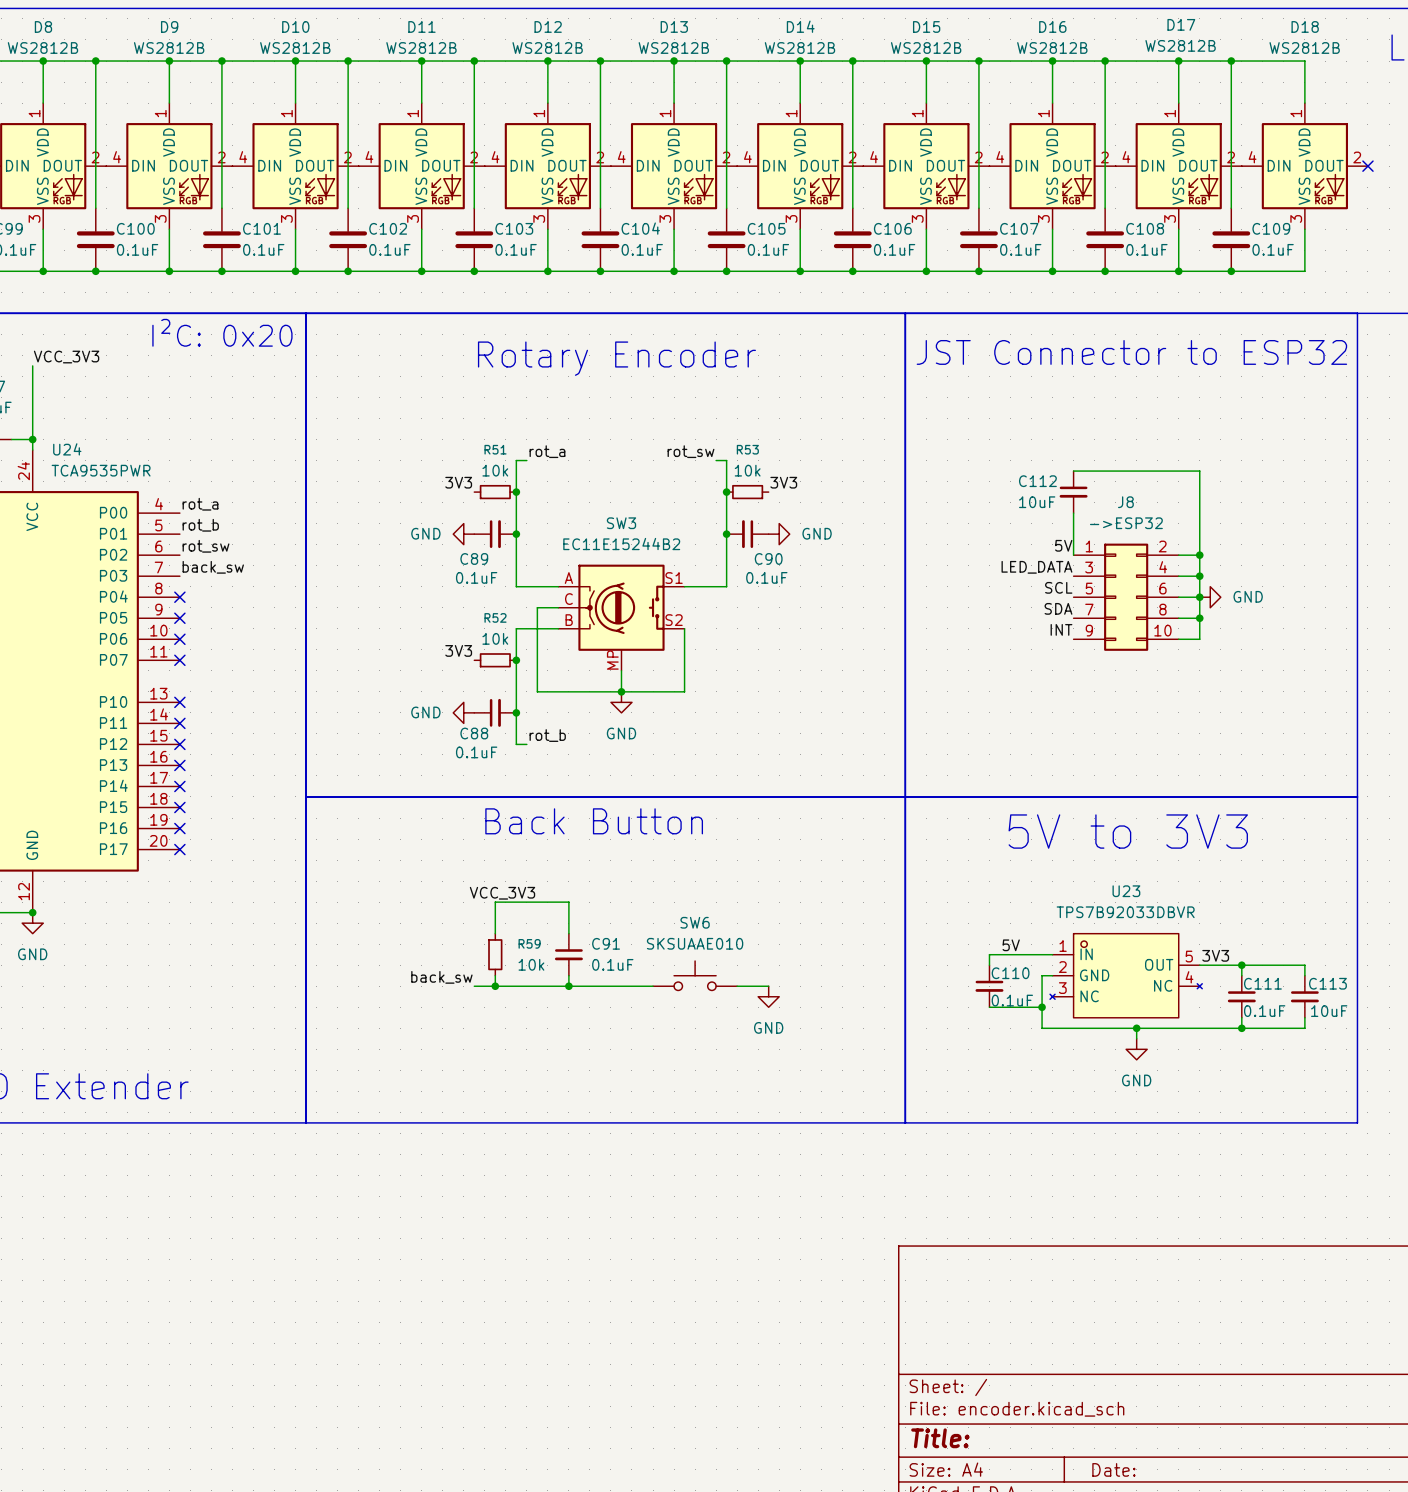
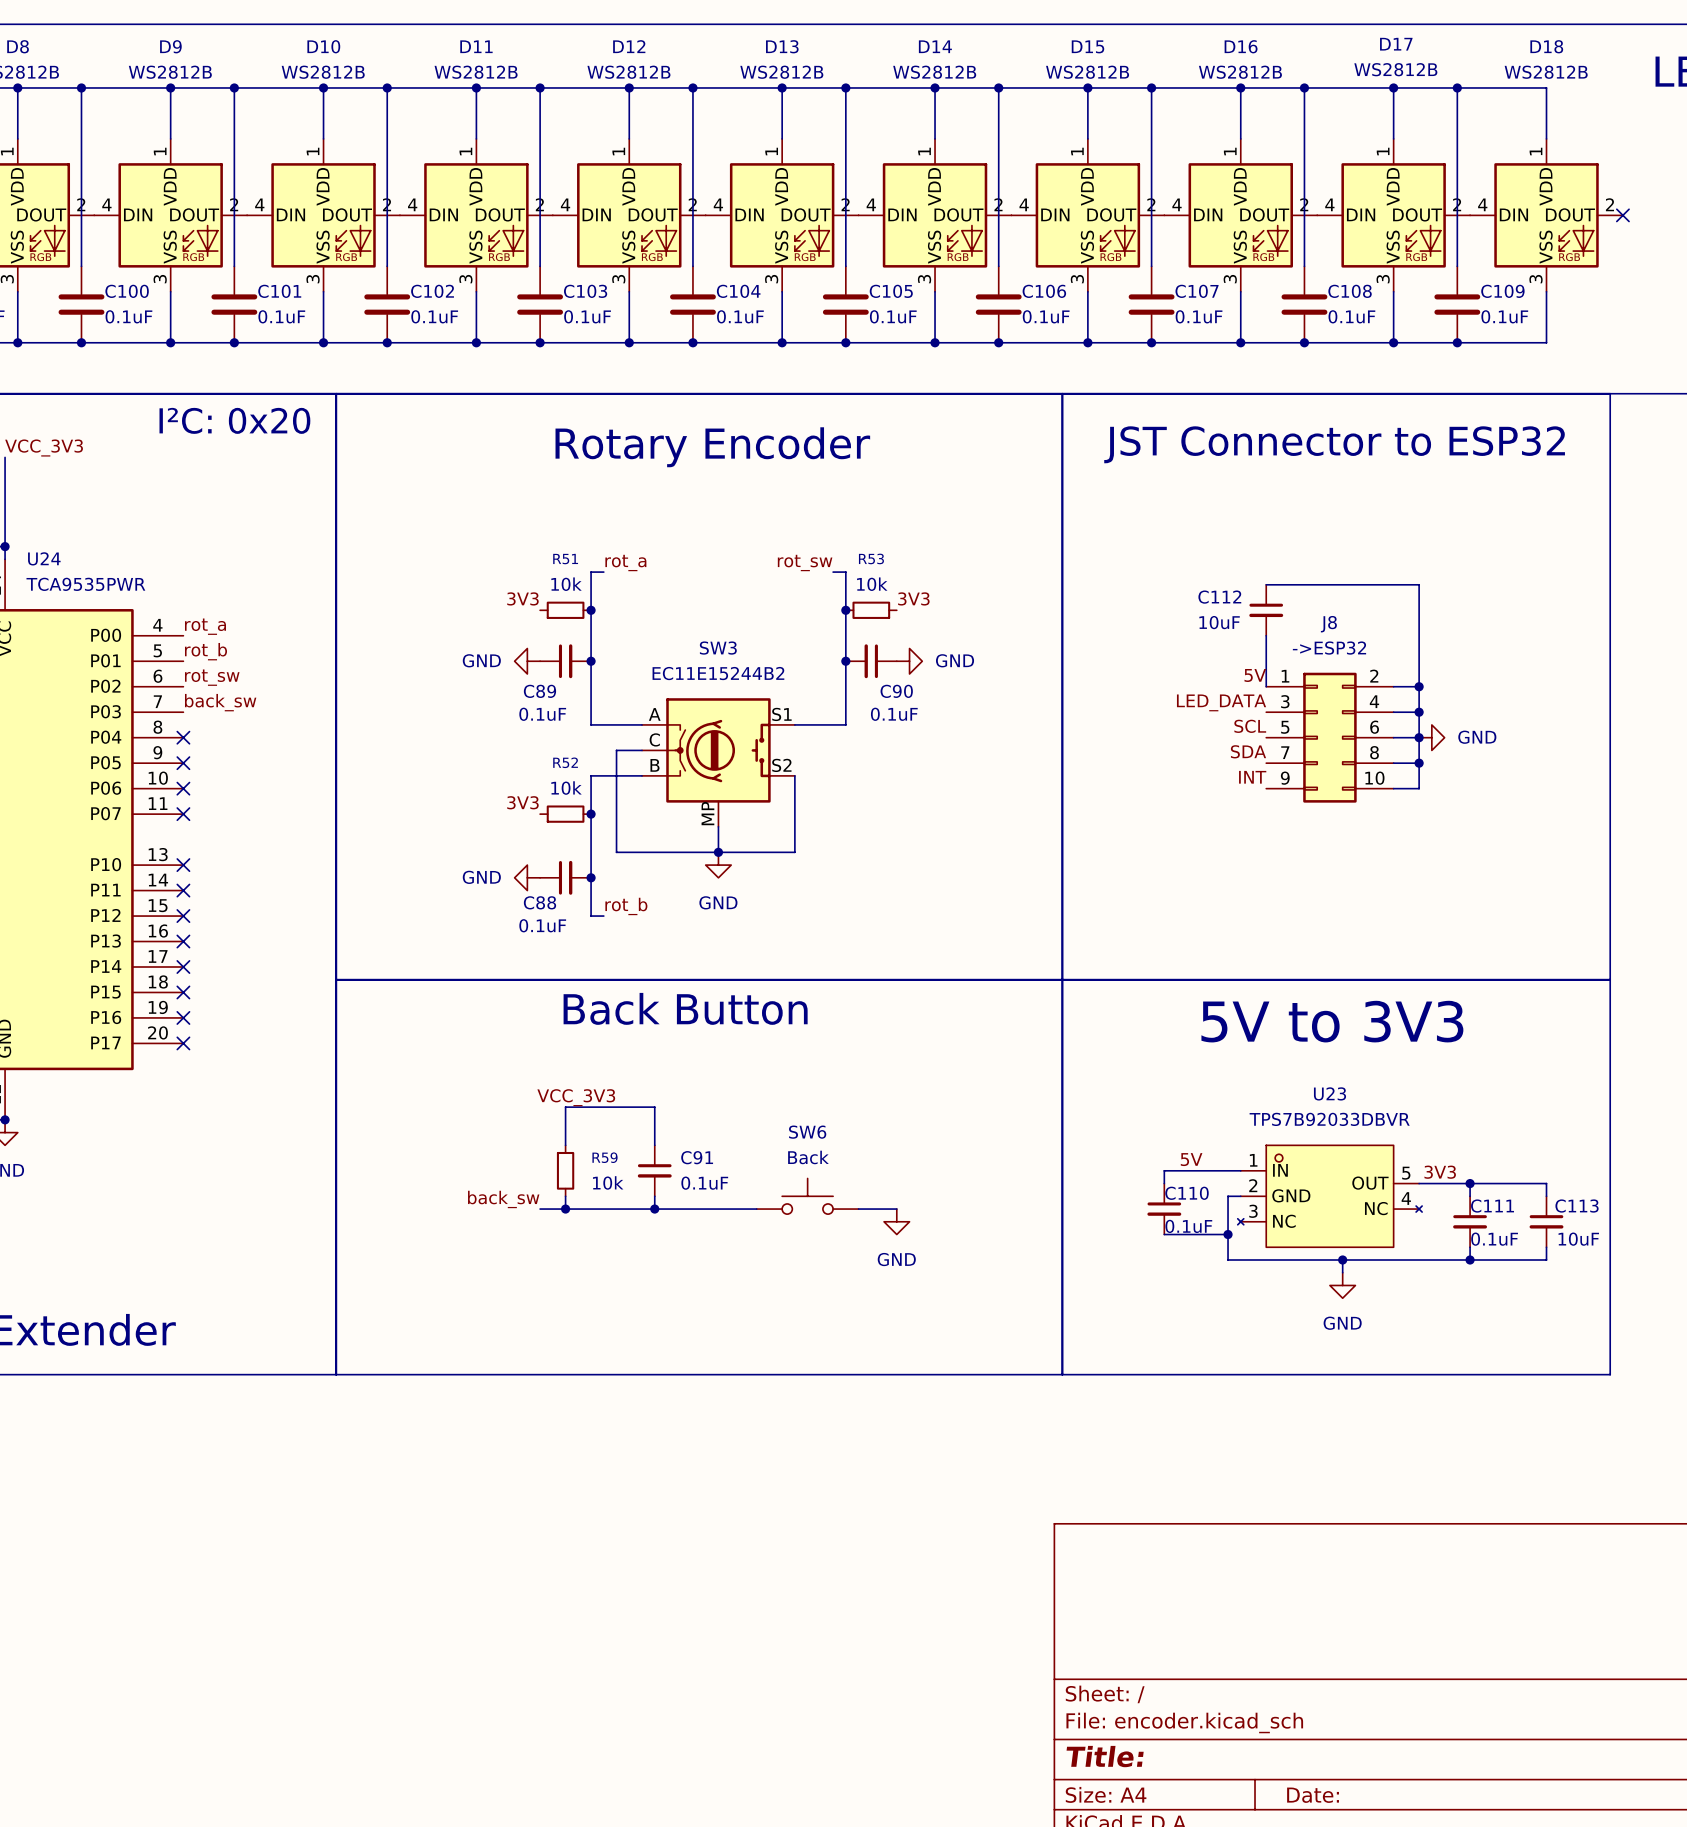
SW6 value: SKSUAAE010 (695, 943) -> Back (808, 1157)

